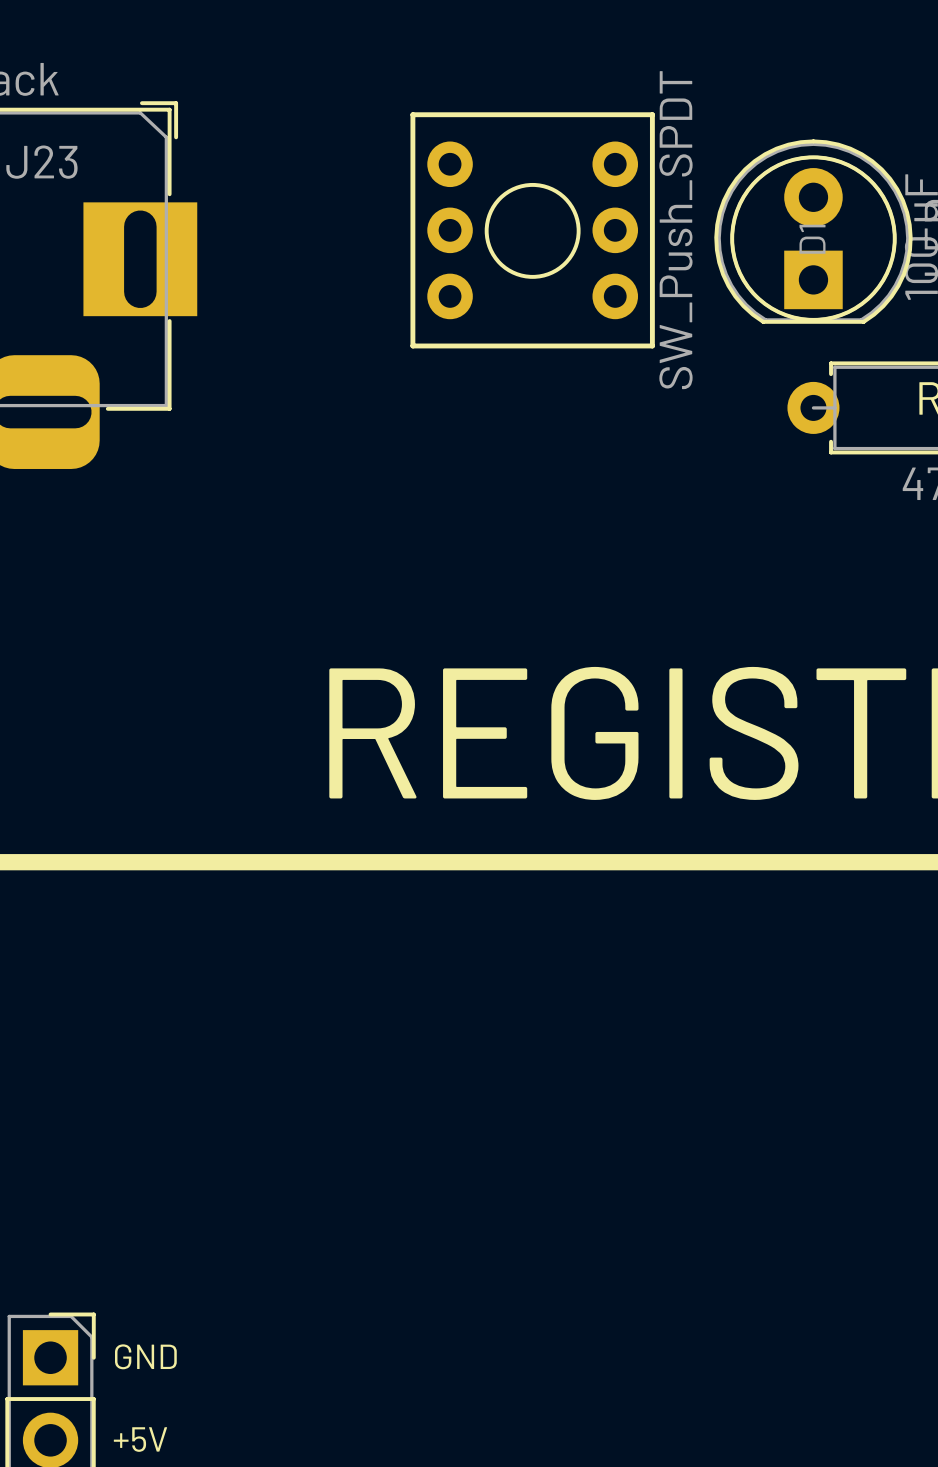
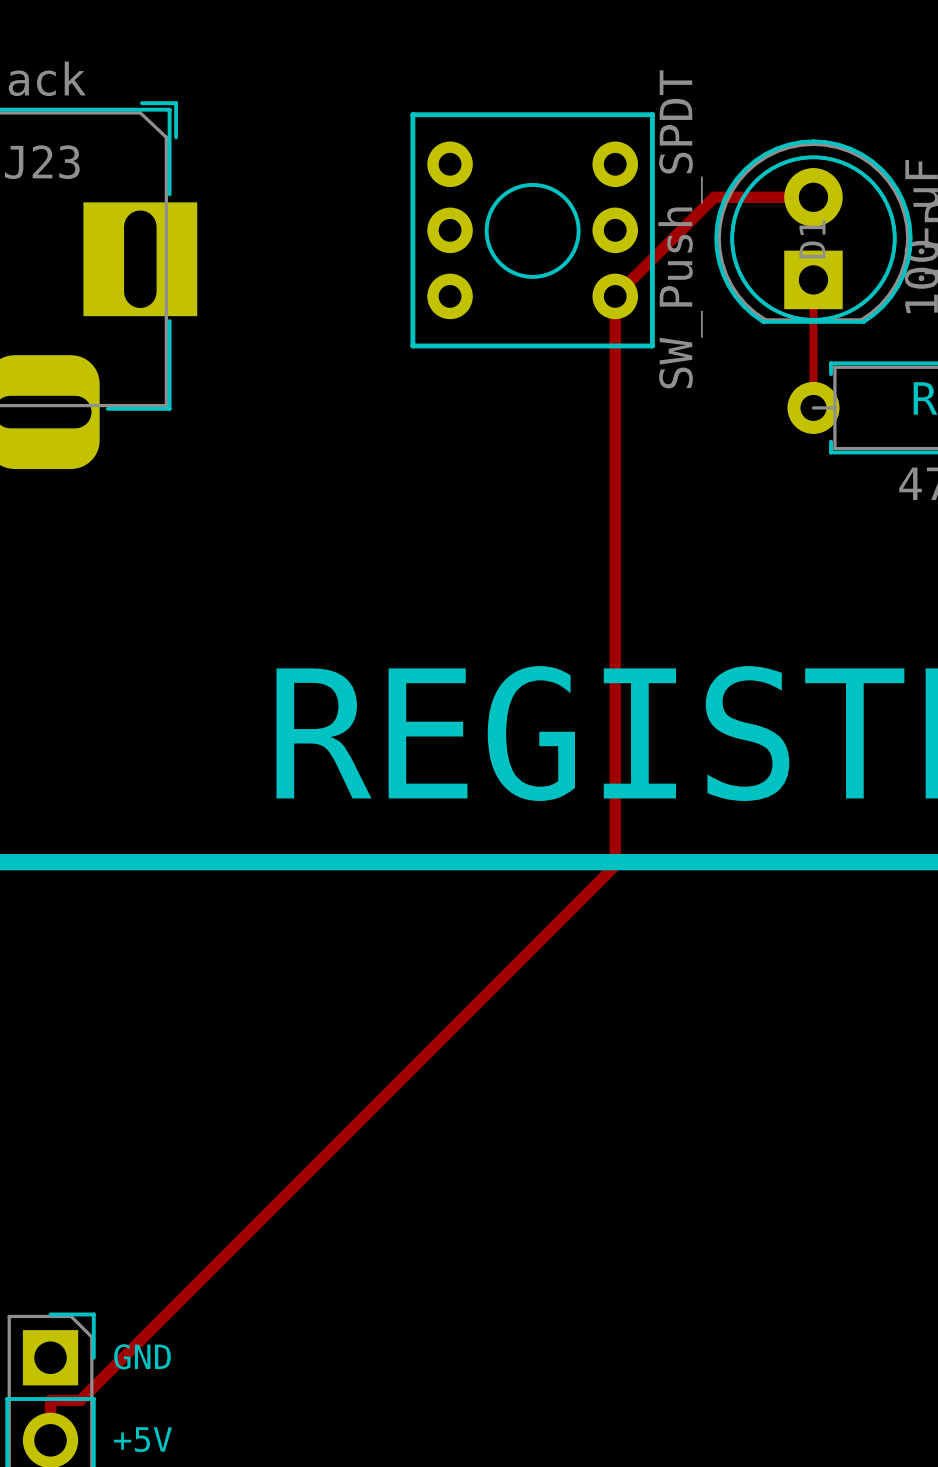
track: none -> (813, 197) (714, 197) (615, 296) (615, 865) (80, 1400) (50, 1400) (50, 1440)
track: none -> (813, 279) (813, 407)

